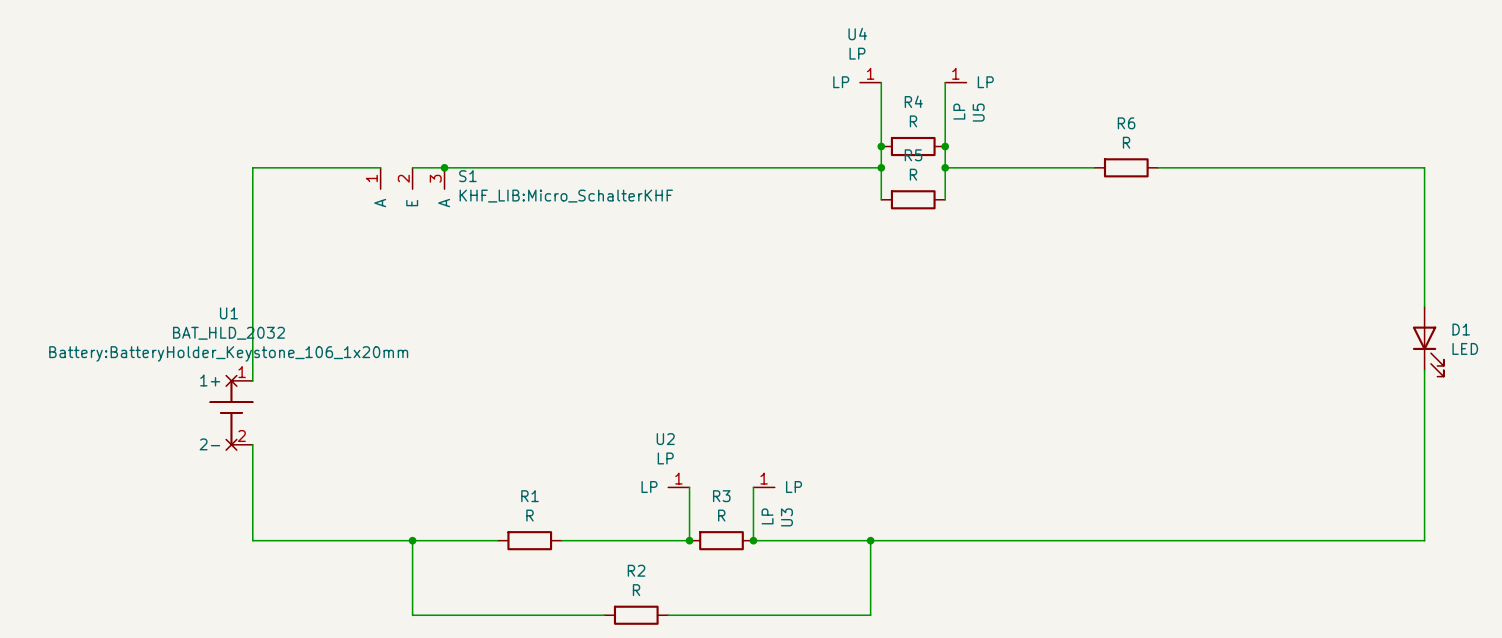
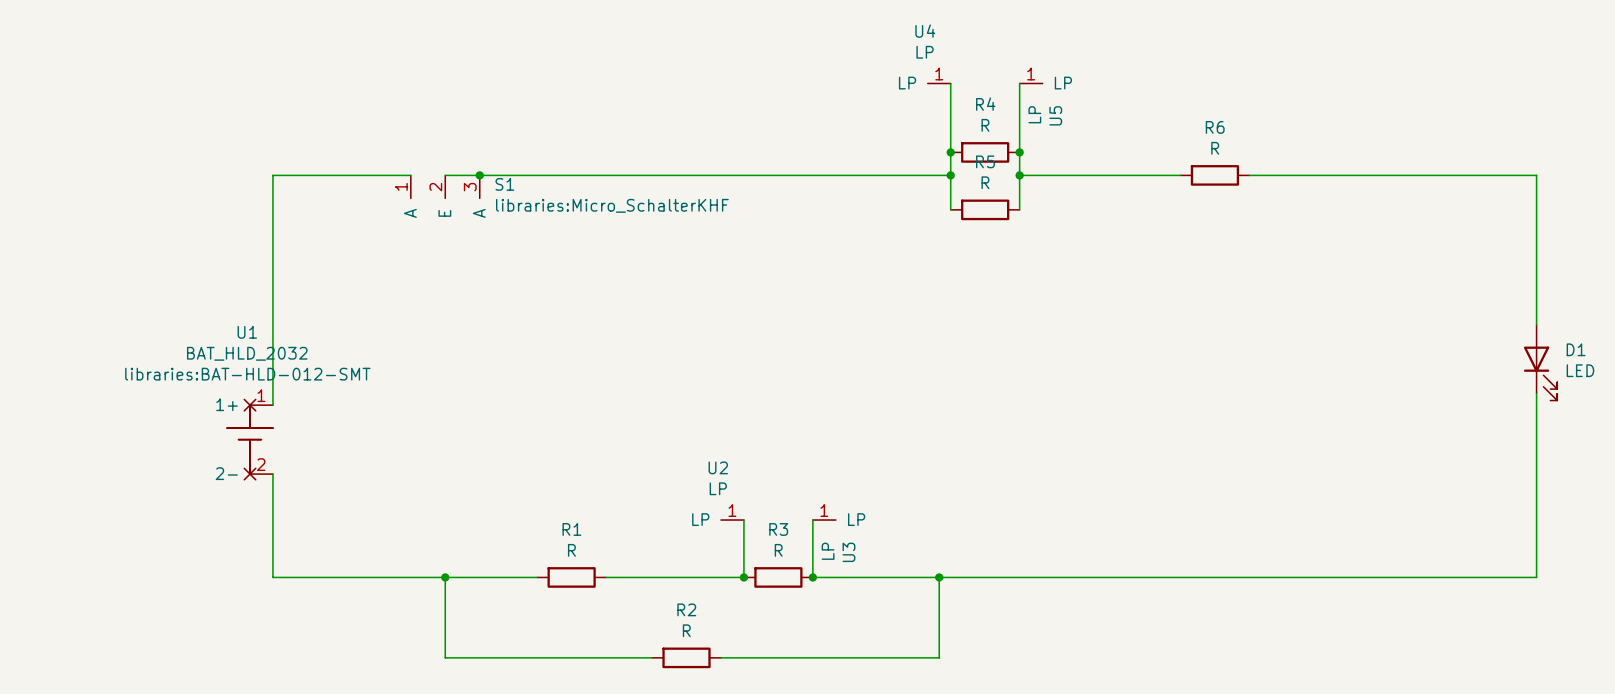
S1 text: KHF_LIB:Micro_SchalterKHF (566, 196) -> libraries:Micro_SchalterKHF (612, 205)
U1 text: Battery:BatteryHolder_Keystone_106_1x20mm (228, 353) -> libraries:BAT-HLD-012-SMT (247, 374)

